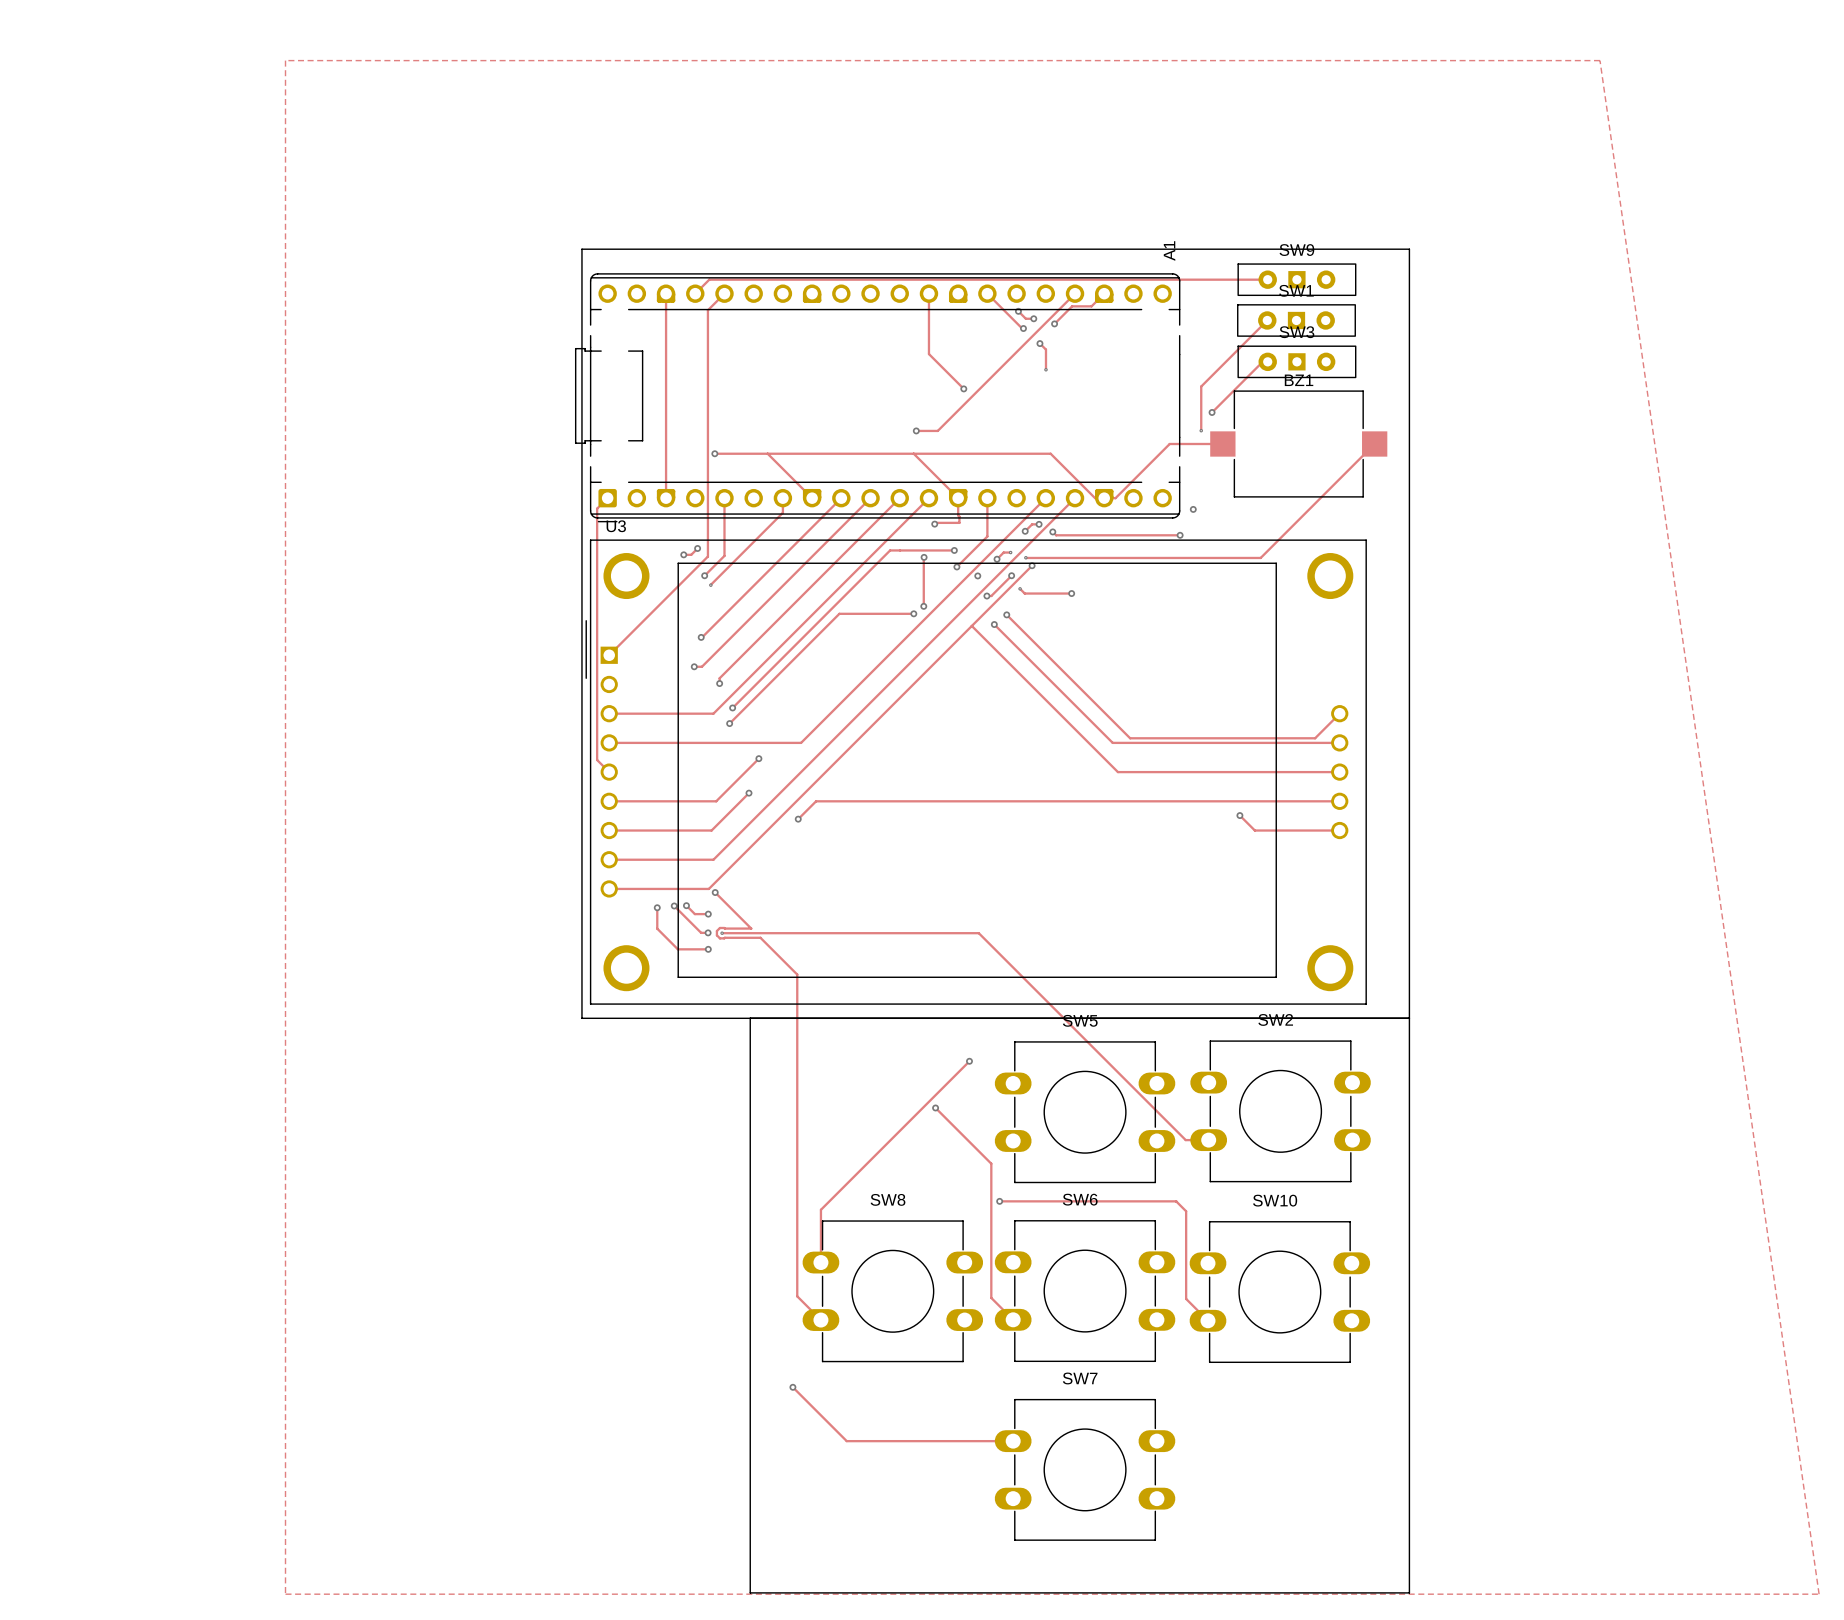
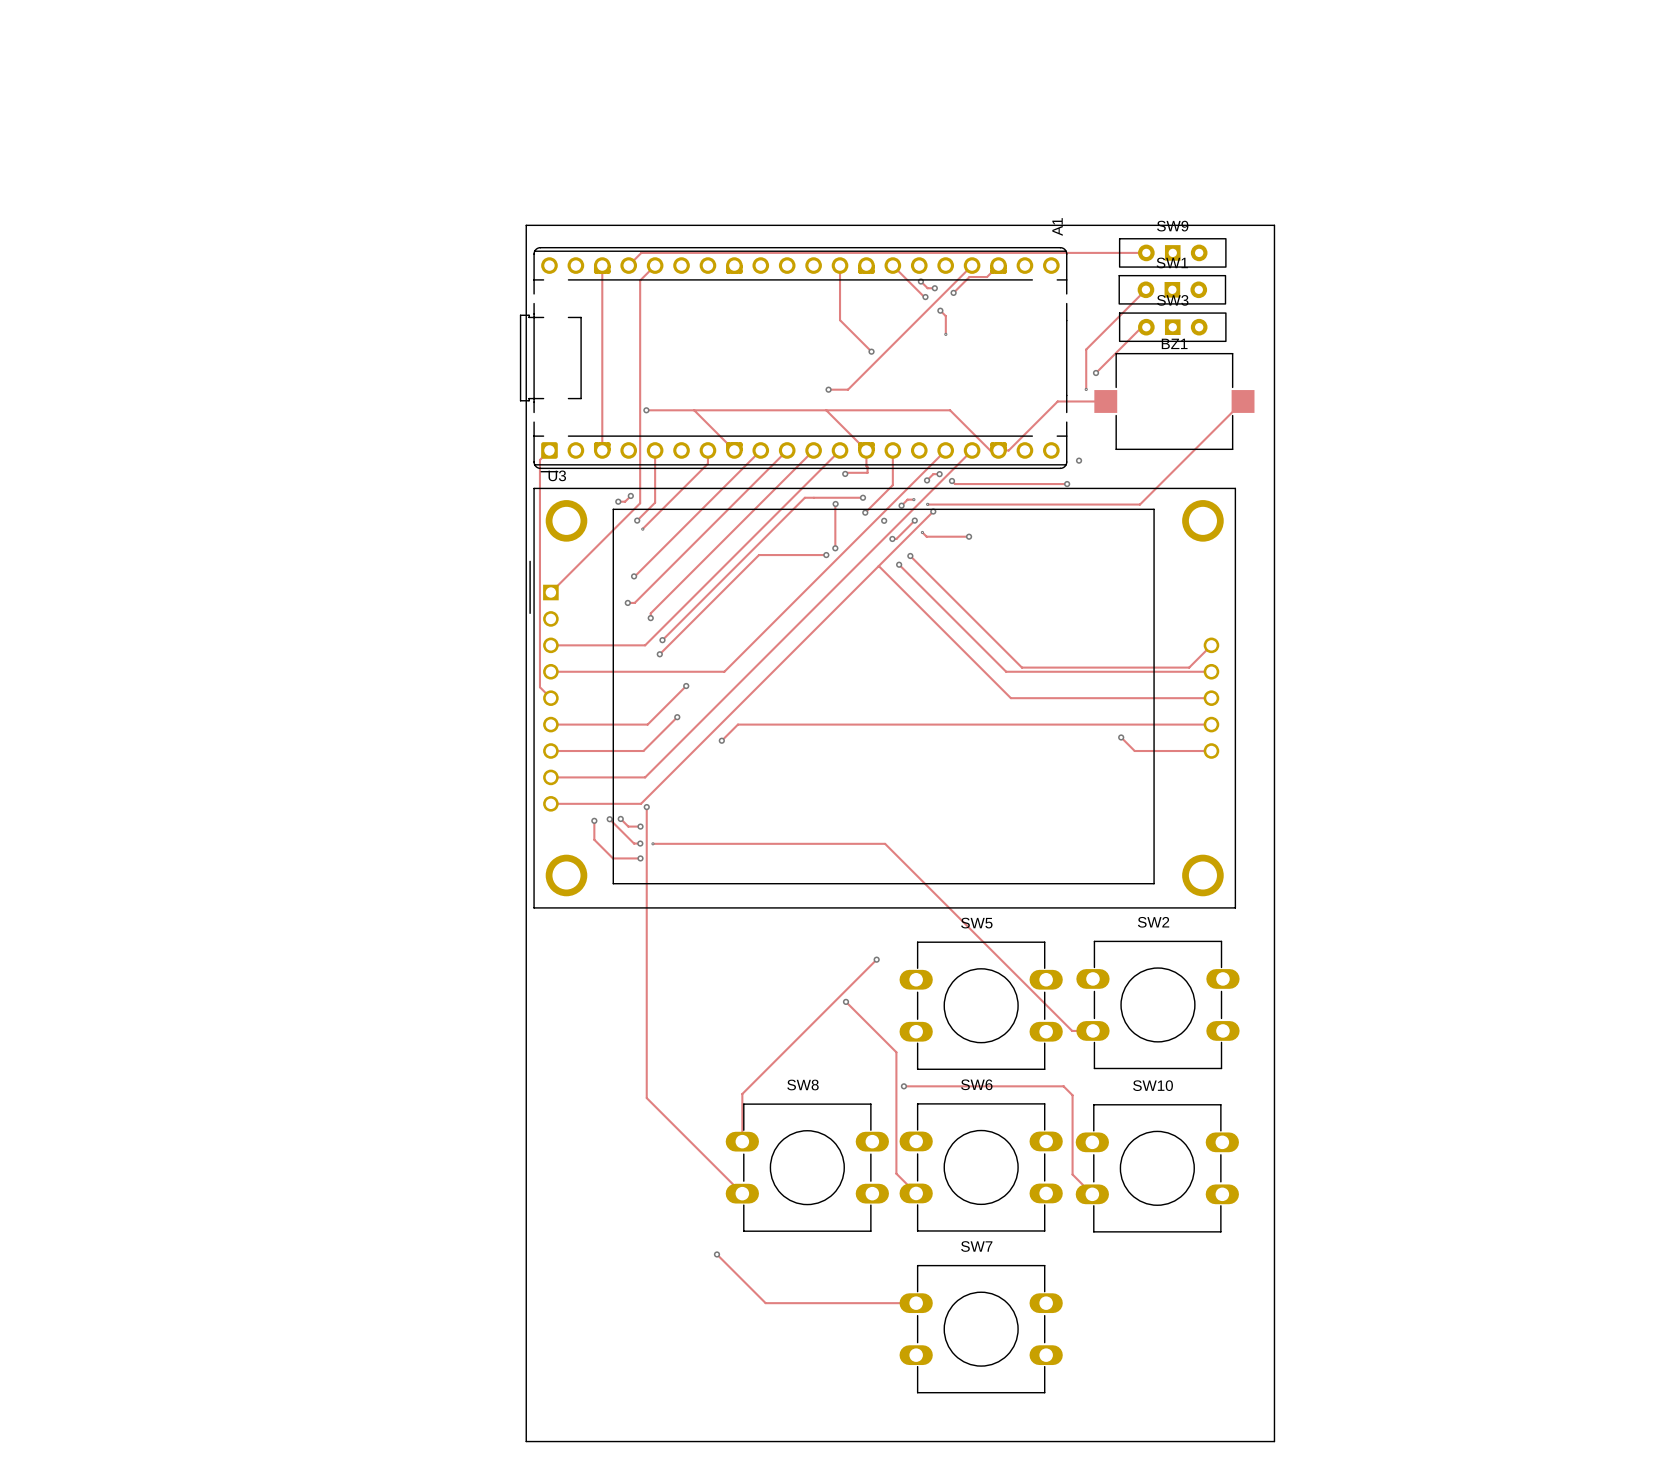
zone outline: (285, 60) (285, 1594) (1819, 1594) (1600, 60) (285, 60) -> none
track: (715, 892) (751, 928) (719, 927) (716, 931) (716, 935) (719, 938) (760, 937) (797, 974) (797, 1296) -> (646, 807) (646, 1098) (720, 1172)
board edge: (581, 1018) (1409, 1018) -> none
board edge: (750, 1018) (750, 1592) (1409, 1592) -> (526, 920) (526, 1441) (1274, 1440)

